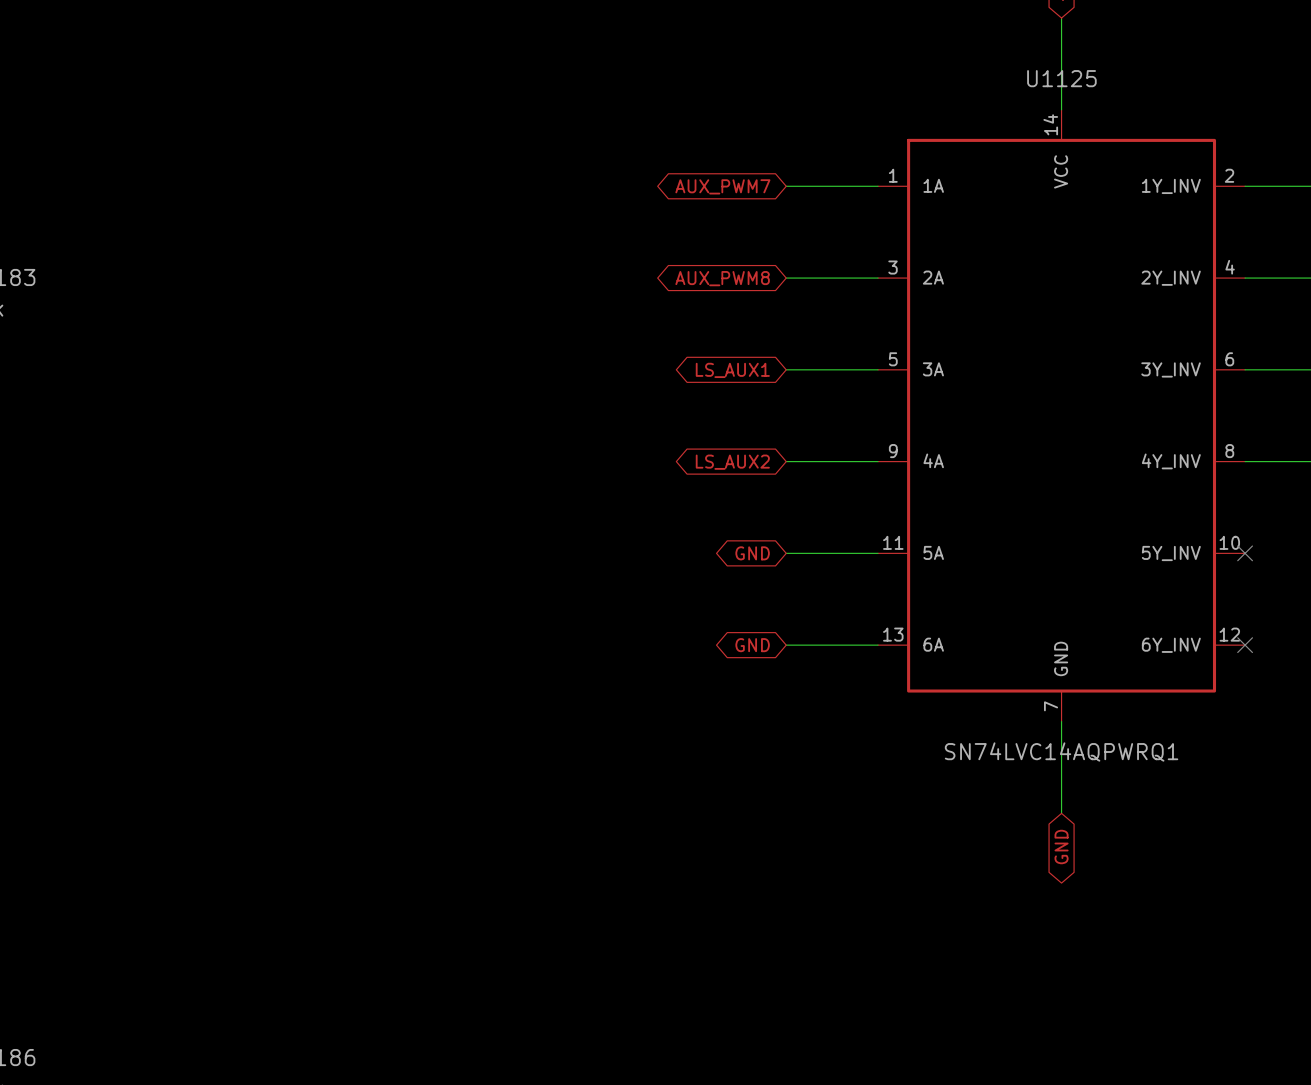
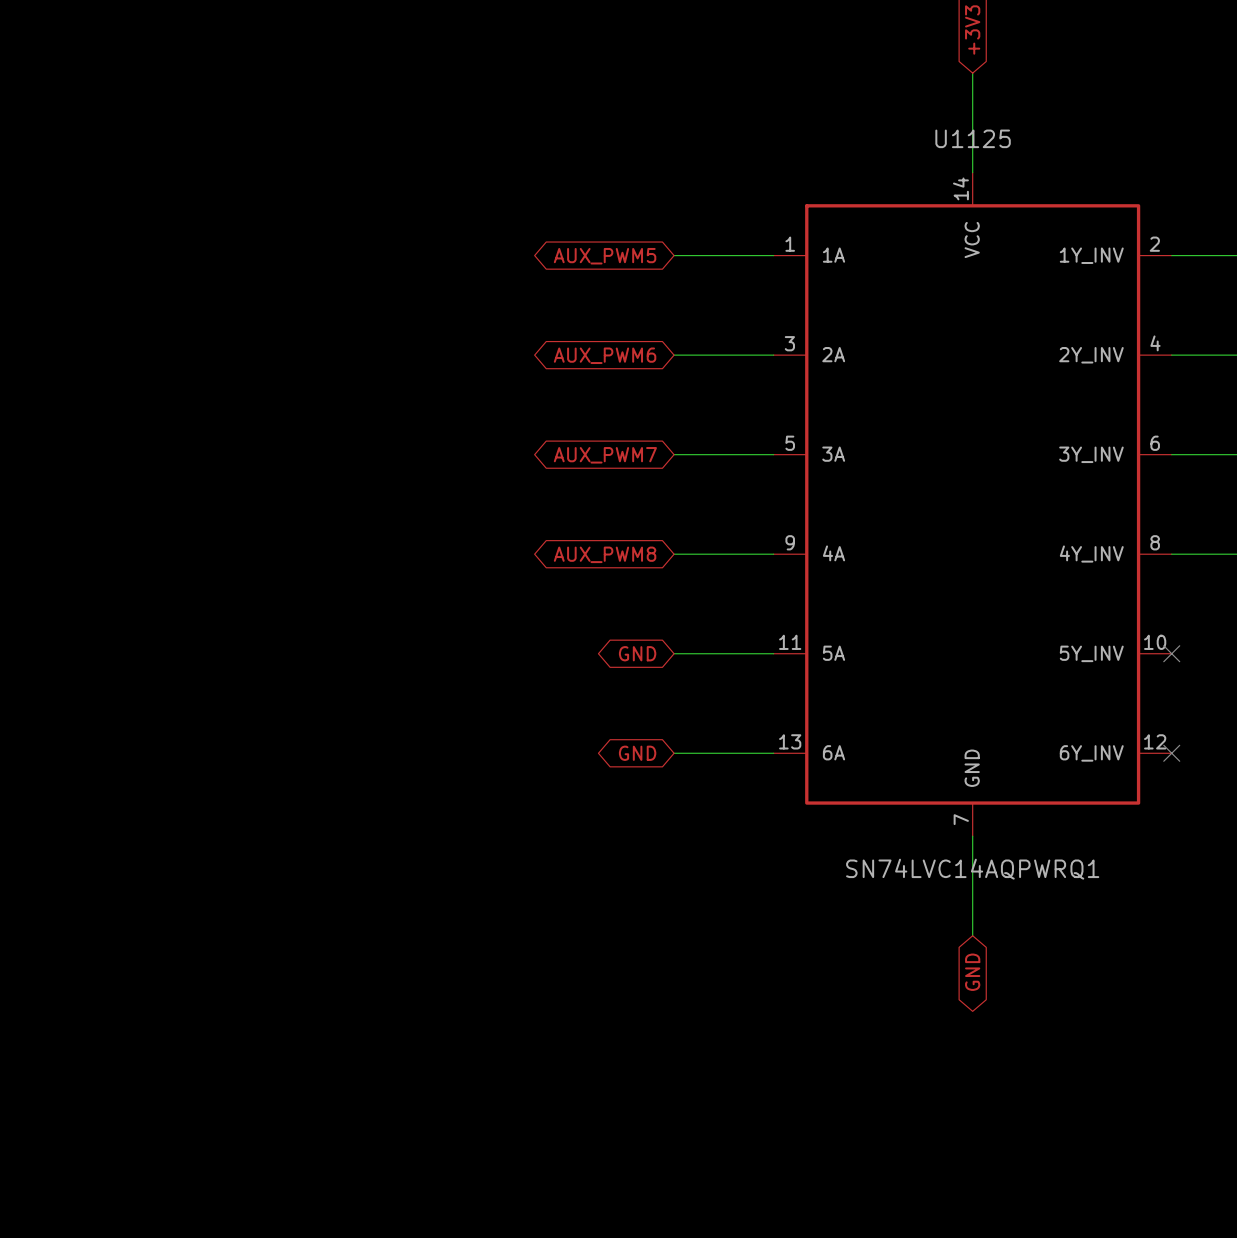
global label: AUX_PWM7 (722, 186) -> AUX_PWM5 (605, 256)
global label: AUX_PWM8 (722, 278) -> AUX_PWM6 (605, 355)
global label: LS_AUX1 (732, 370) -> AUX_PWM7 (605, 455)
global label: LS_AUX2 (732, 462) -> AUX_PWM8 (605, 554)

